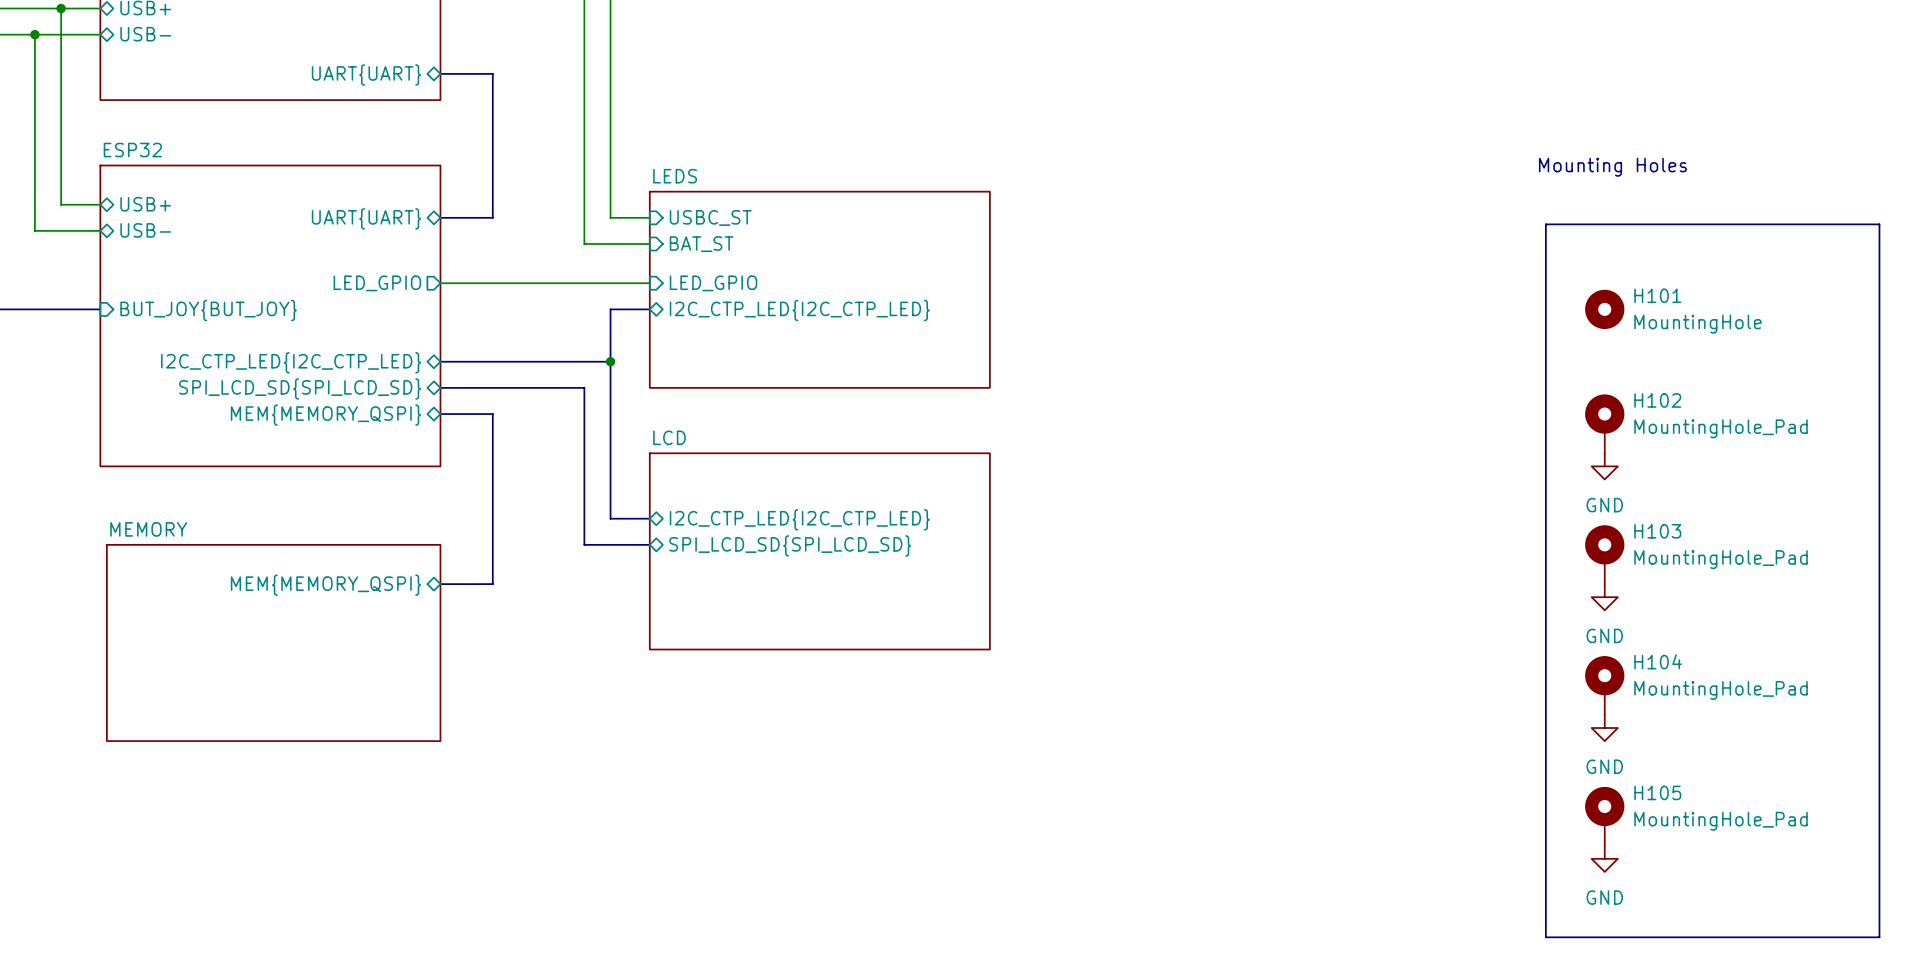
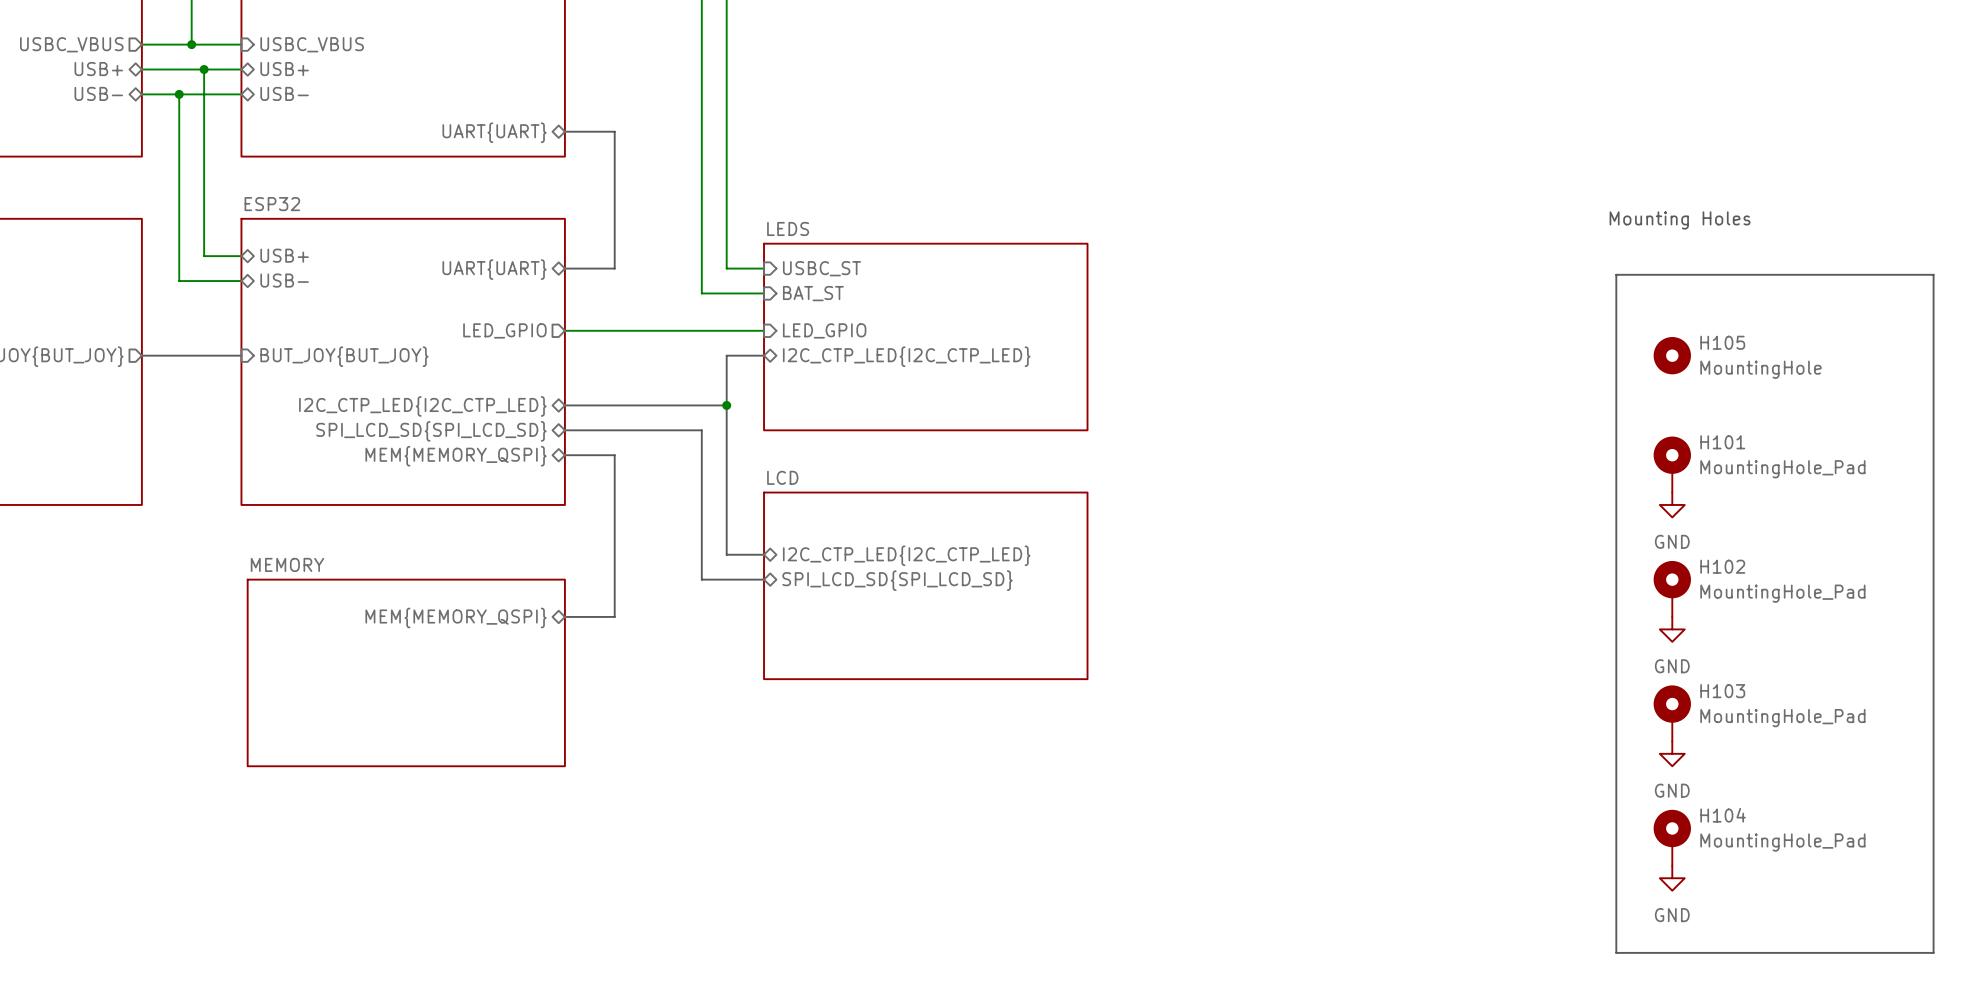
H101 name: H101 (1657, 295) -> H105 (1722, 342)
H102 name: H102 (1657, 400) -> H101 (1722, 442)
H103 name: H103 (1657, 531) -> H102 (1722, 566)
H104 name: H104 (1658, 661) -> H103 (1722, 691)
H105 name: H105 (1657, 792) -> H104 (1723, 815)

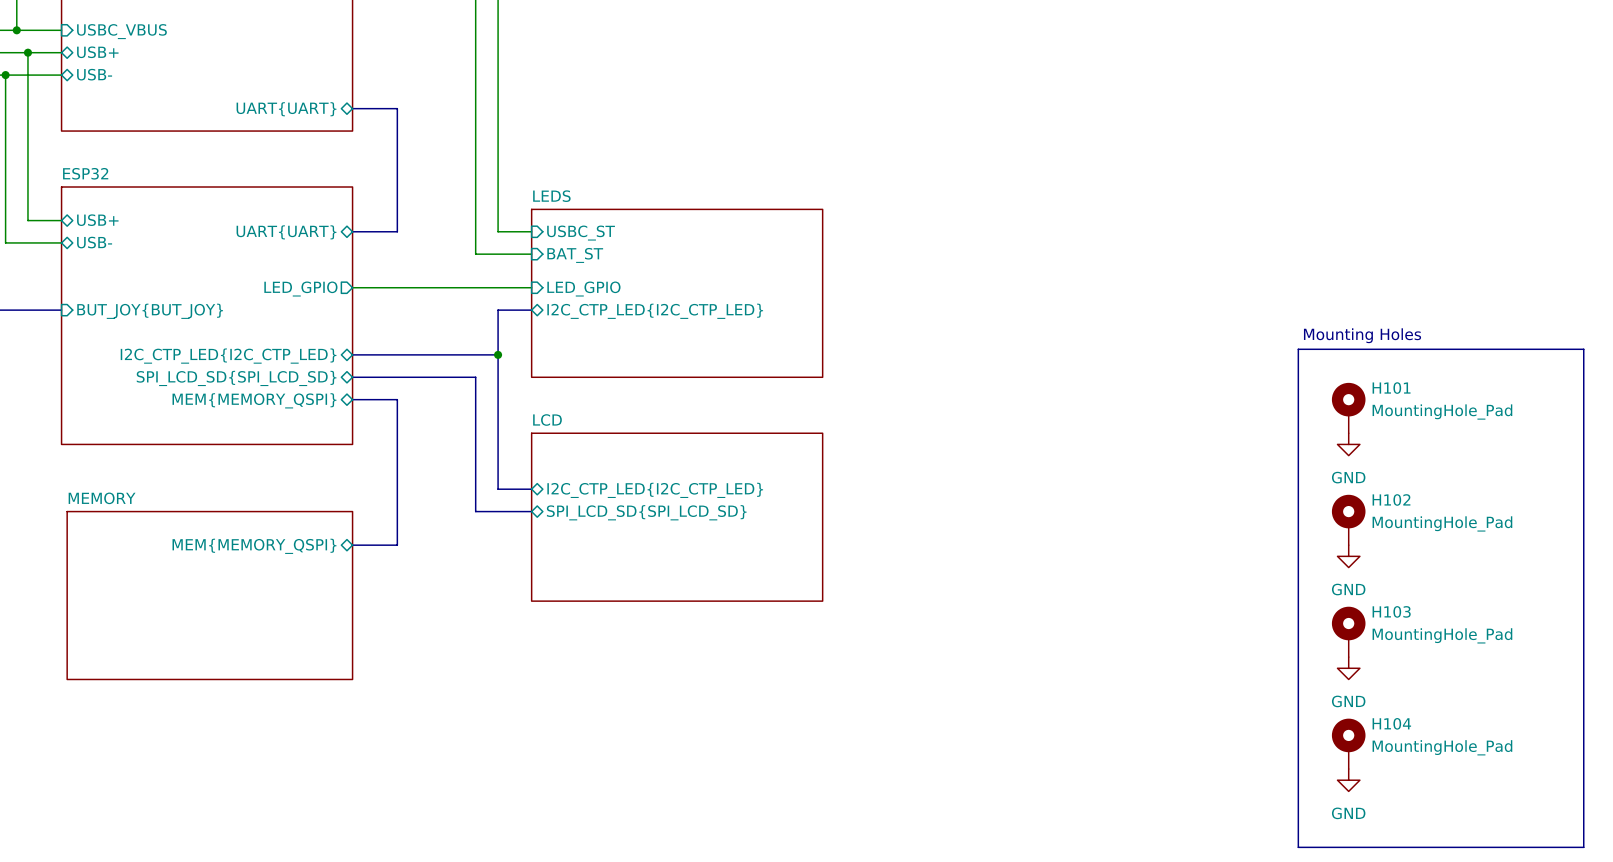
text position: Mounting Holes (1680, 220) -> Mounting Holes (1362, 335)
H105: MountingHole (1672, 355) -> none
line: (1616, 399) (1616, 274) (1933, 274) (1933, 399) -> (1298, 349) (1583, 349)

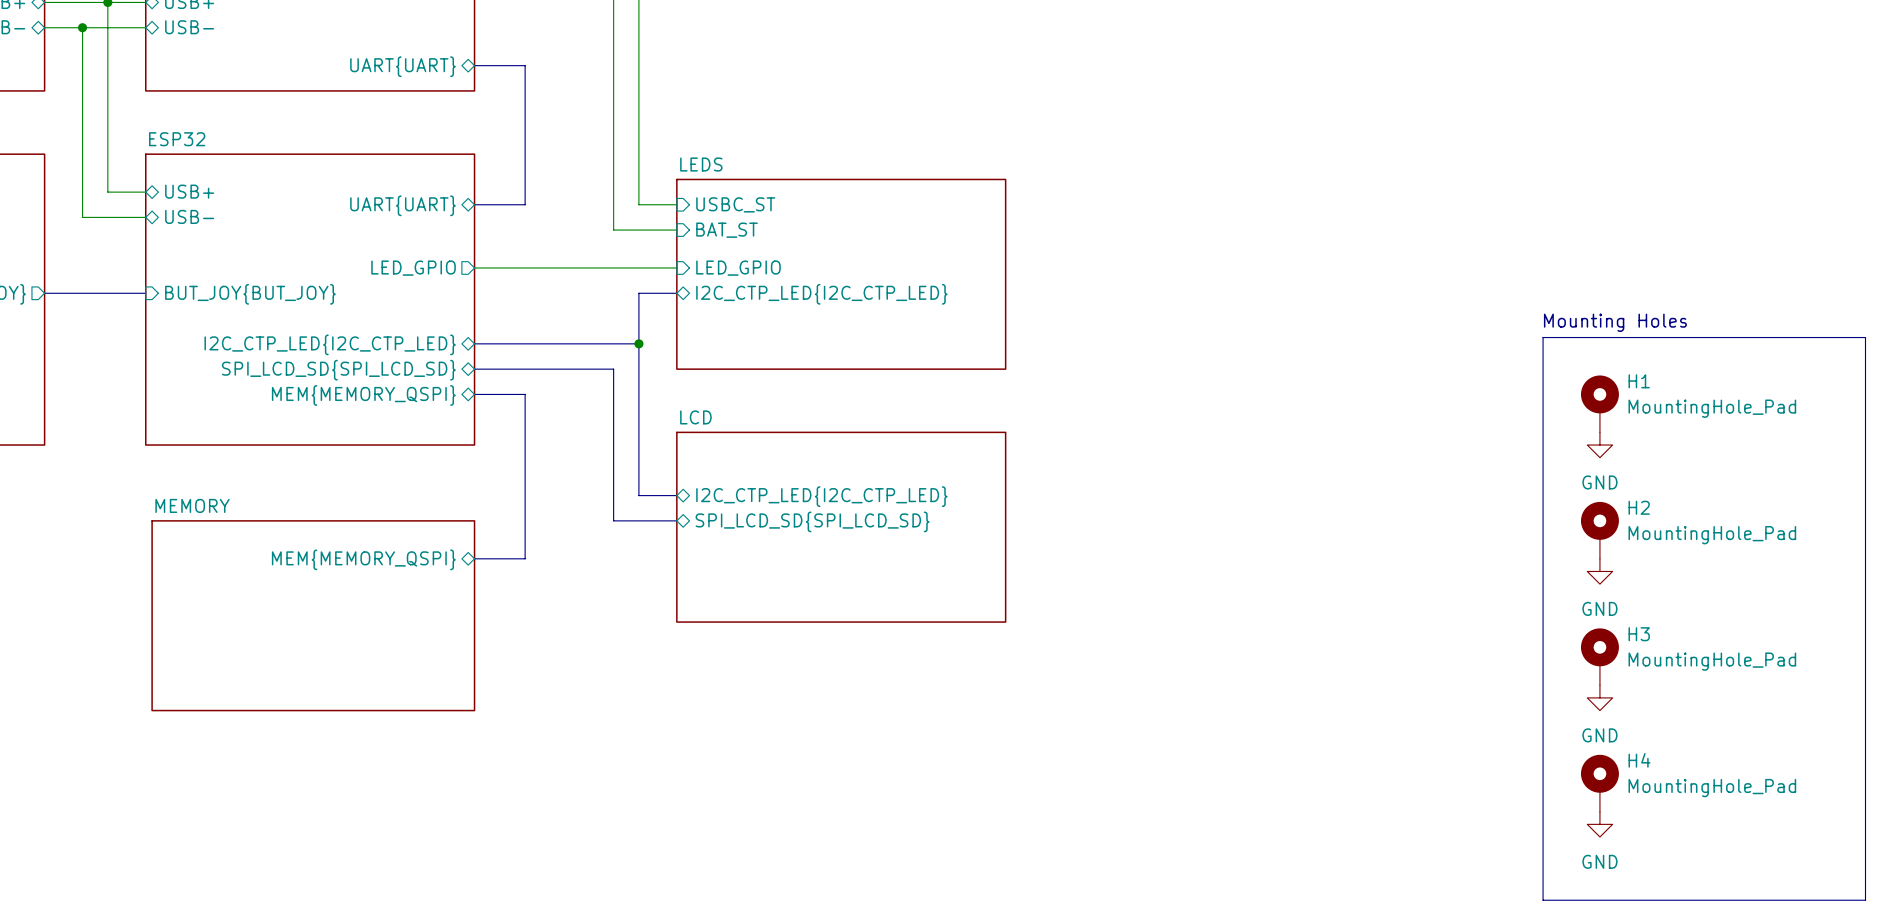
H101 name: H101 (1391, 388) -> H1 (1639, 381)
H102 name: H102 (1391, 499) -> H2 (1639, 507)
H103 name: H103 (1391, 611) -> H3 (1639, 634)
H104 name: H104 (1391, 723) -> H4 (1639, 760)

